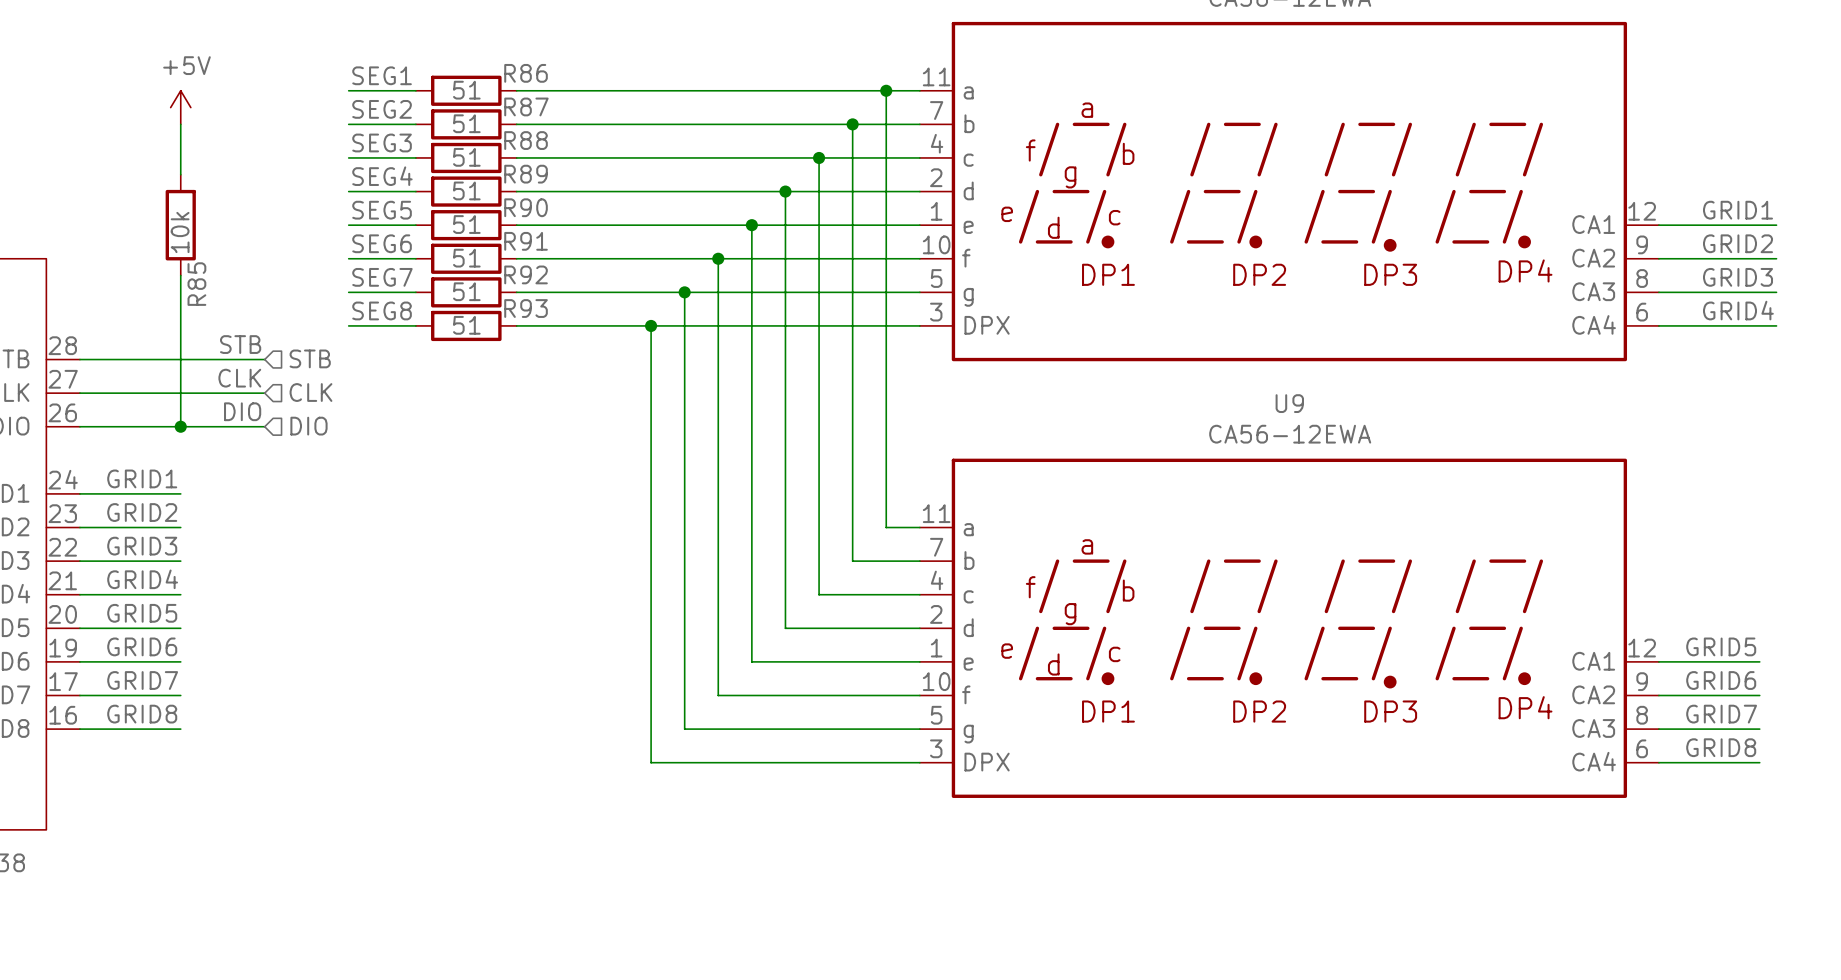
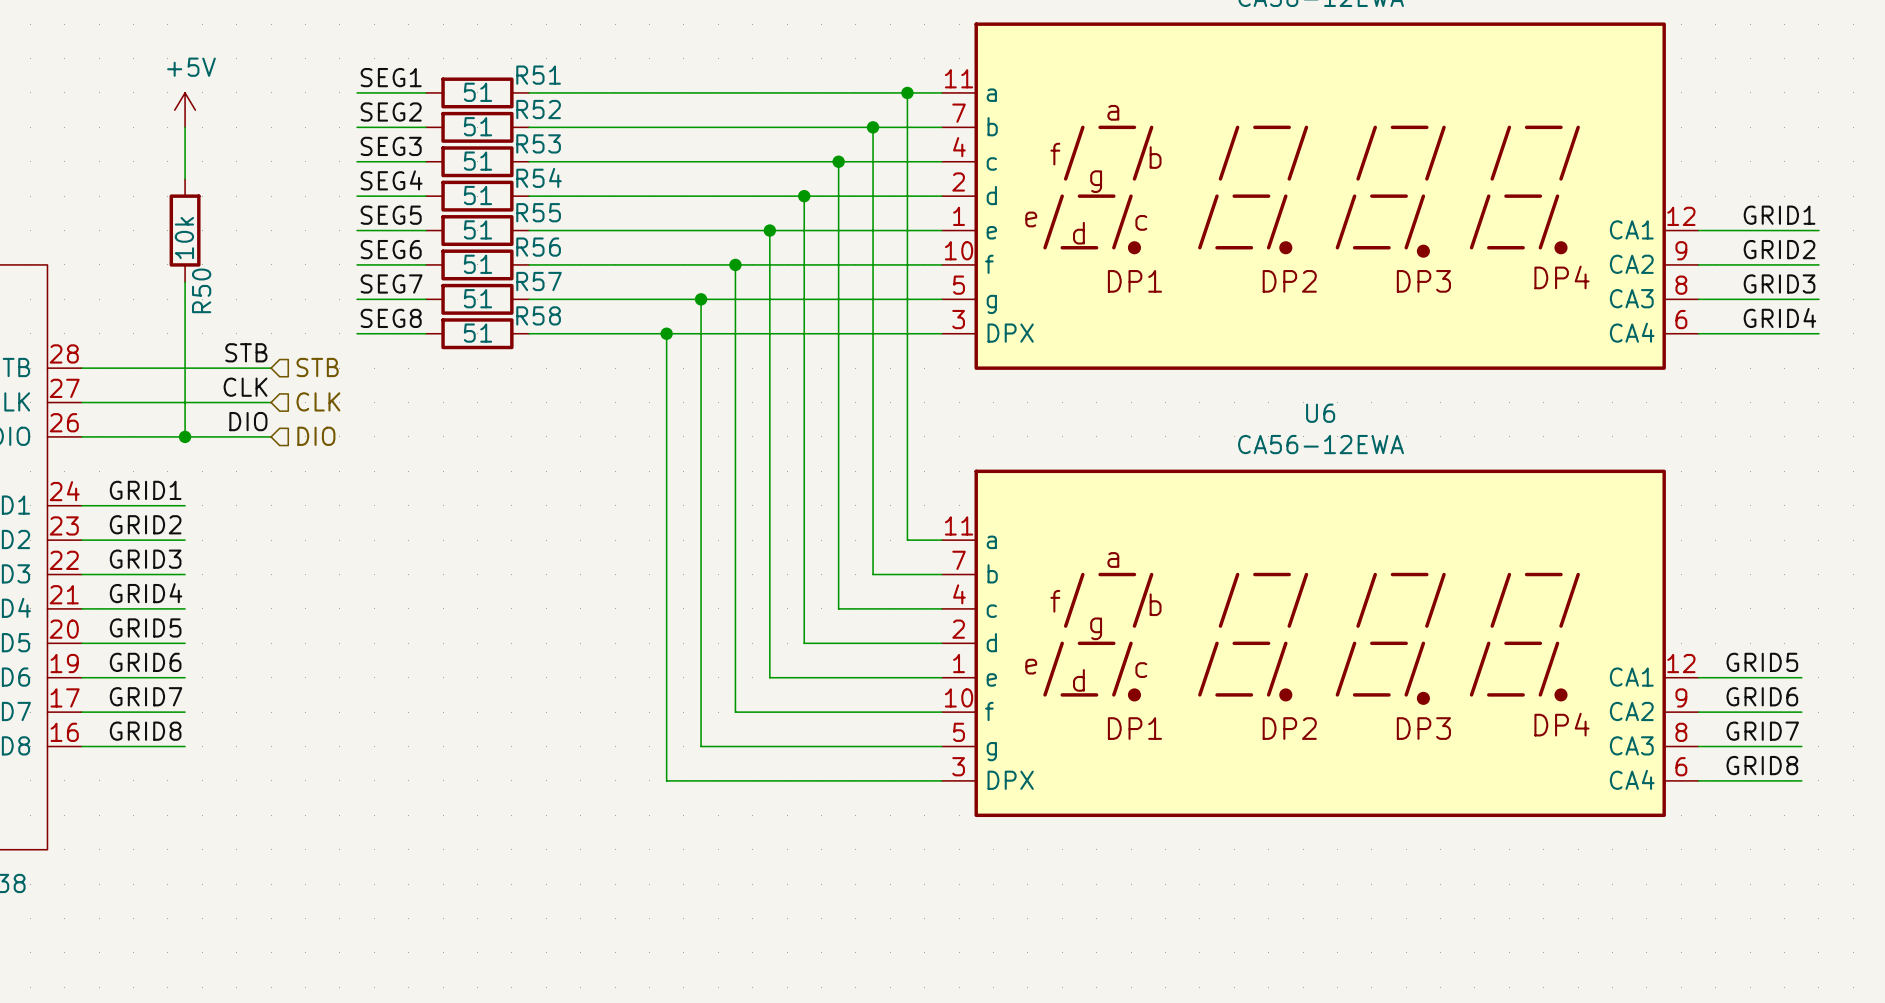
R86 name: R86 (526, 73) -> R51 (538, 75)
R87 name: R87 (526, 106) -> R52 (538, 109)
R88 name: R88 (526, 140) -> R53 (538, 143)
R89 name: R89 (526, 174) -> R54 (539, 177)
R90 name: R90 (526, 207) -> R55 (538, 212)
R91 name: R91 (526, 241) -> R56 (538, 247)
R92 name: R92 (526, 274) -> R57 (539, 281)
R85 name: R85 (196, 284) -> R50 (201, 290)
R93 name: R93 (526, 308) -> R58 (538, 315)
U9 name: U9 (1289, 403) -> U6 (1320, 413)

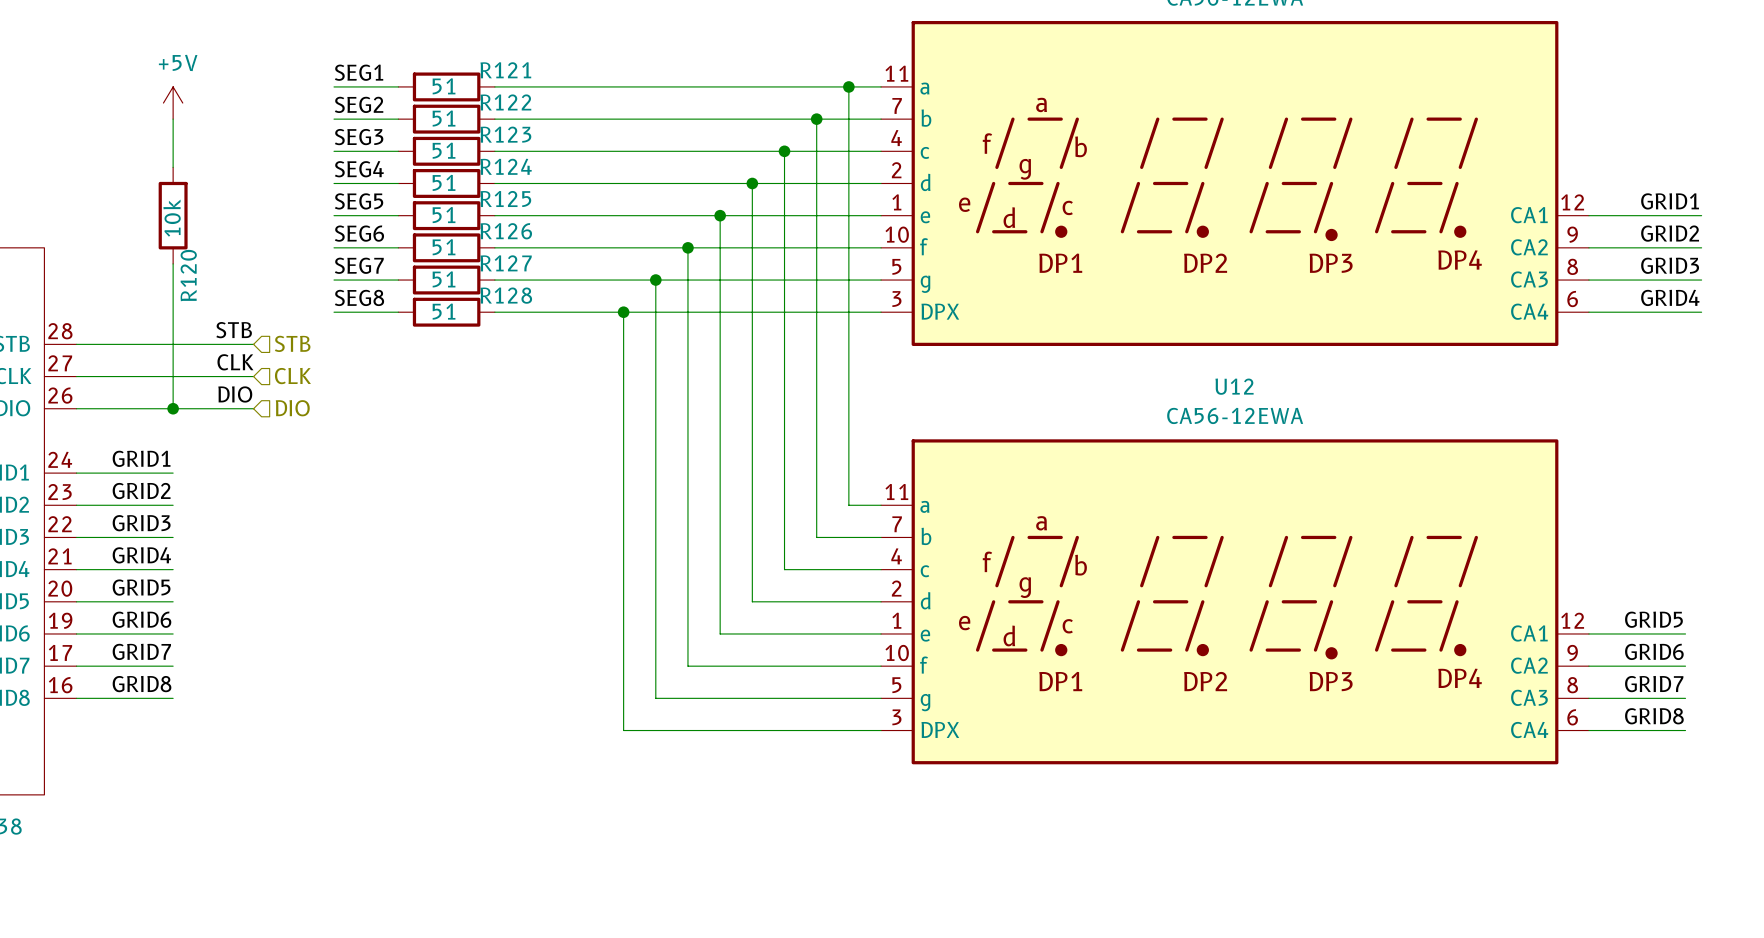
R51 name: R51 (538, 75) -> R121 (505, 70)
R52 name: R52 (538, 109) -> R122 (505, 102)
R53 name: R53 (538, 143) -> R123 (505, 134)
R54 name: R54 (539, 177) -> R124 (506, 166)
R55 name: R55 (538, 212) -> R125 (505, 198)
R56 name: R56 (538, 247) -> R126 (506, 231)
R57 name: R57 (539, 281) -> R127 (506, 263)
R50 name: R50 (201, 290) -> R120 (188, 275)
R58 name: R58 (538, 315) -> R128 (506, 295)
U6 name: U6 (1320, 413) -> U12 (1234, 386)

